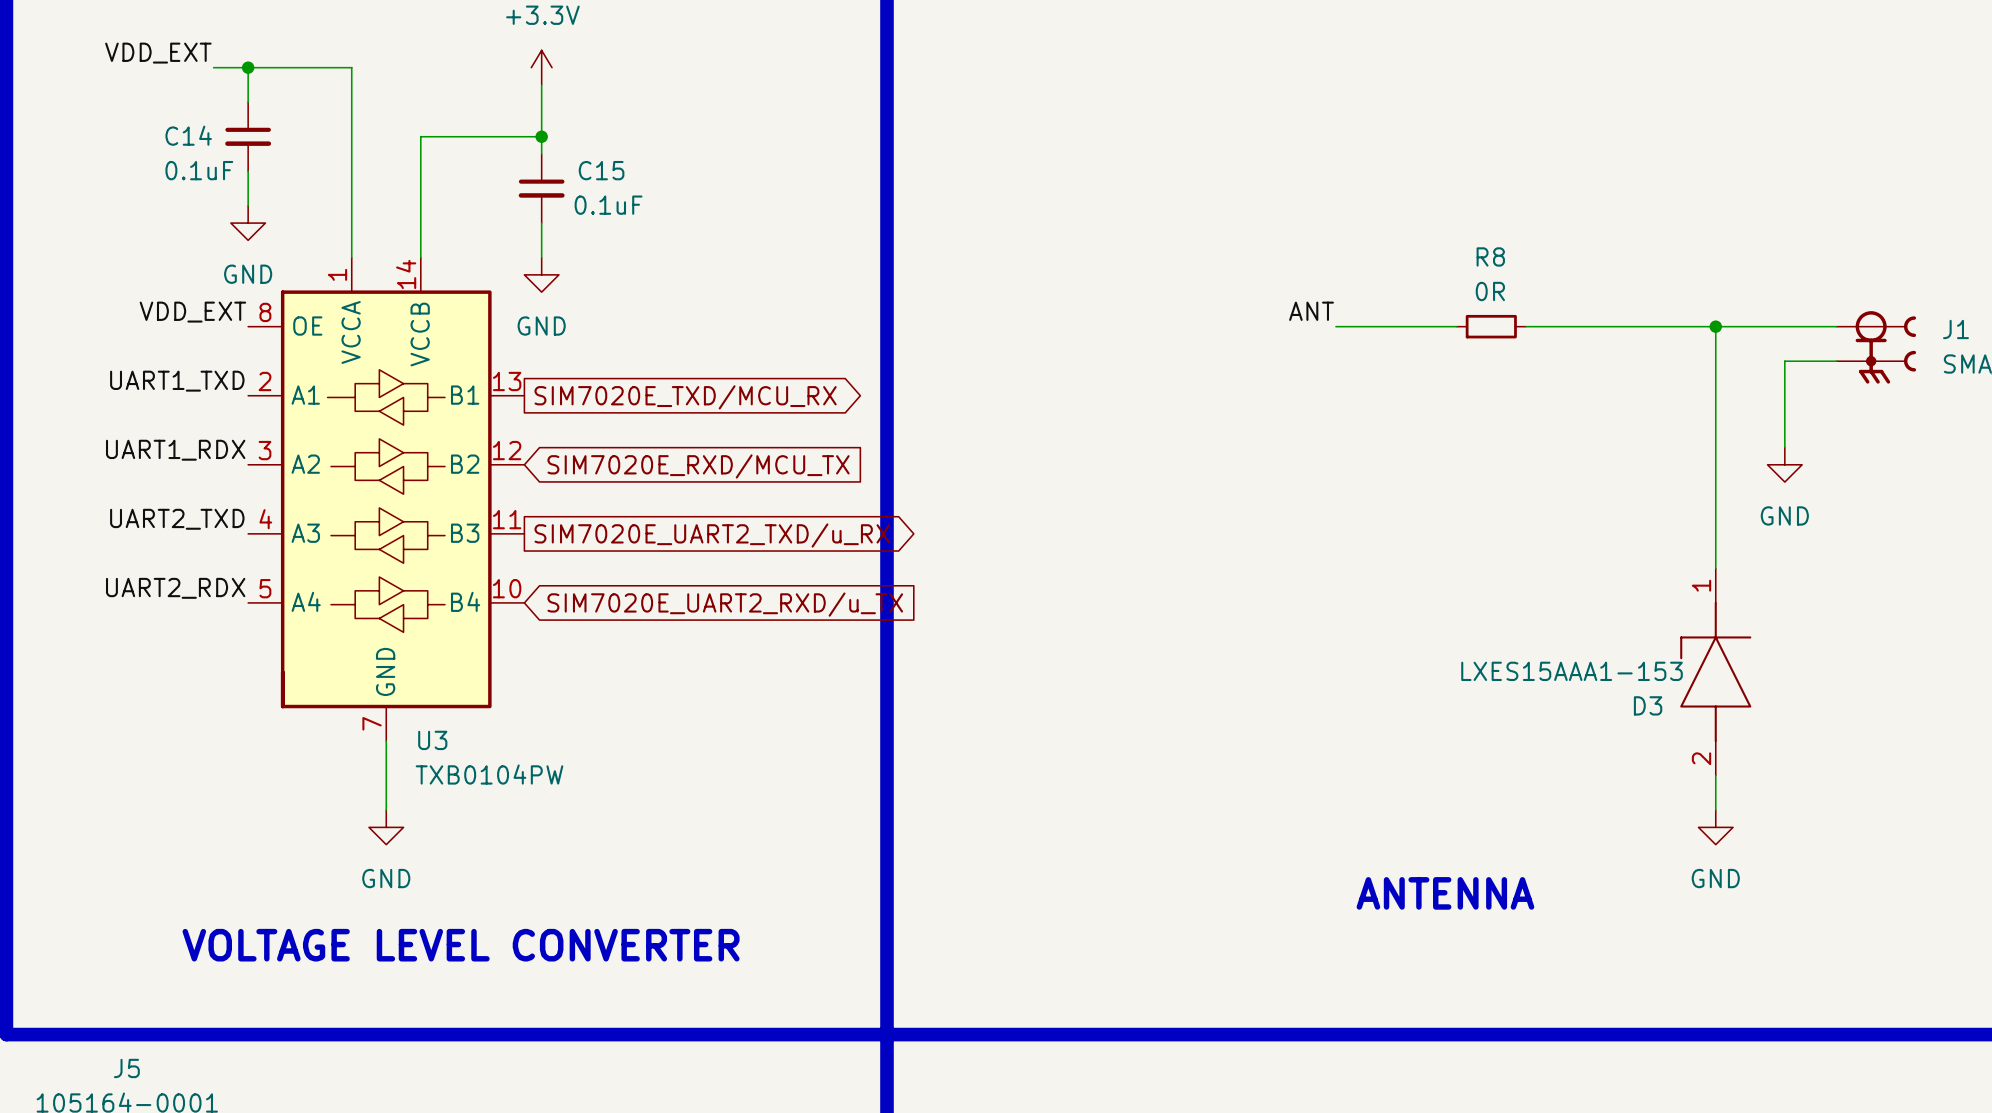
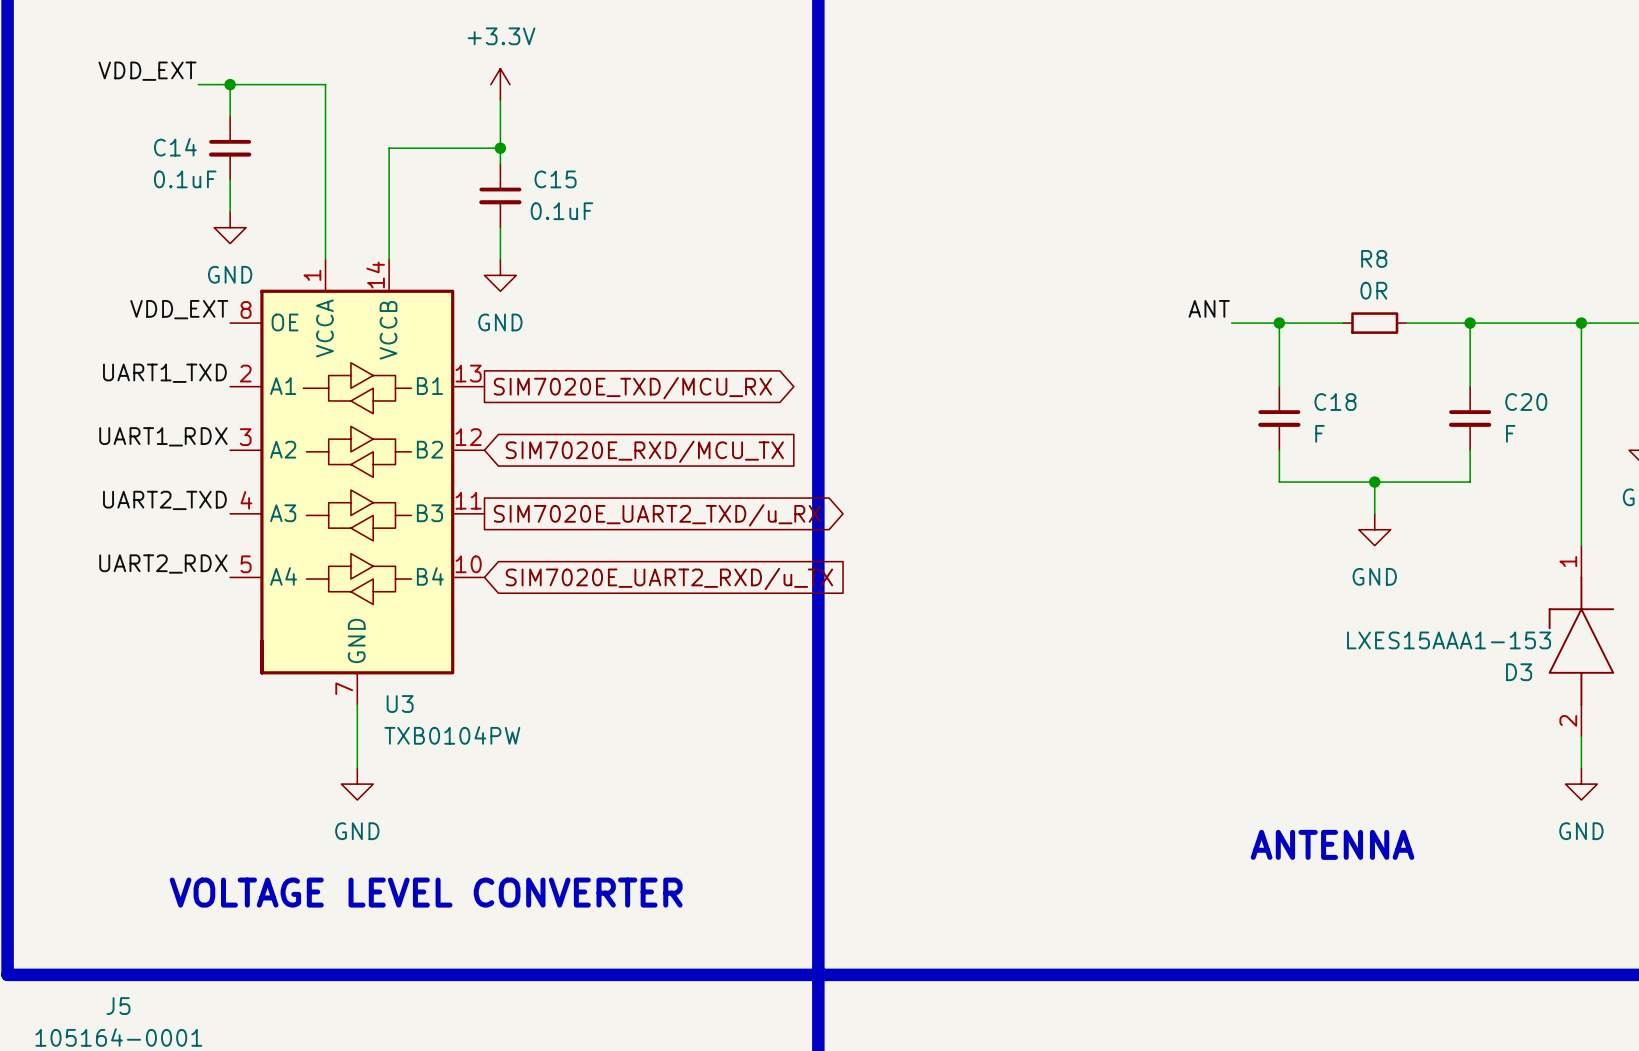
wire: none -> (1279, 323) (1279, 386)
junction: none -> (1279, 323)
wire: none -> (1470, 323) (1470, 386)
junction: none -> (1470, 323)
C18: none -> F (1279, 418)
C20: none -> F (1470, 418)
wire: none -> (1279, 450) (1279, 482) (1470, 482) (1470, 450)
wire: none -> (1374, 482) (1374, 513)
junction: none -> (1374, 482)
power symbol: none -> GND (1374, 529)

